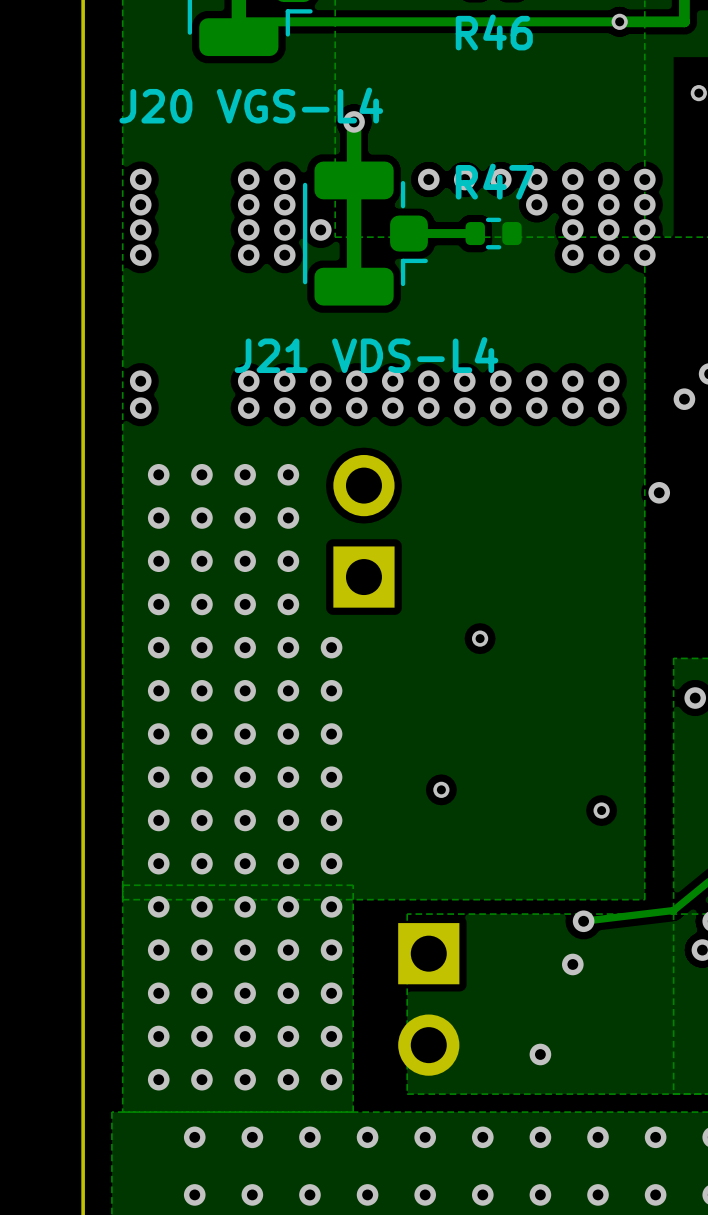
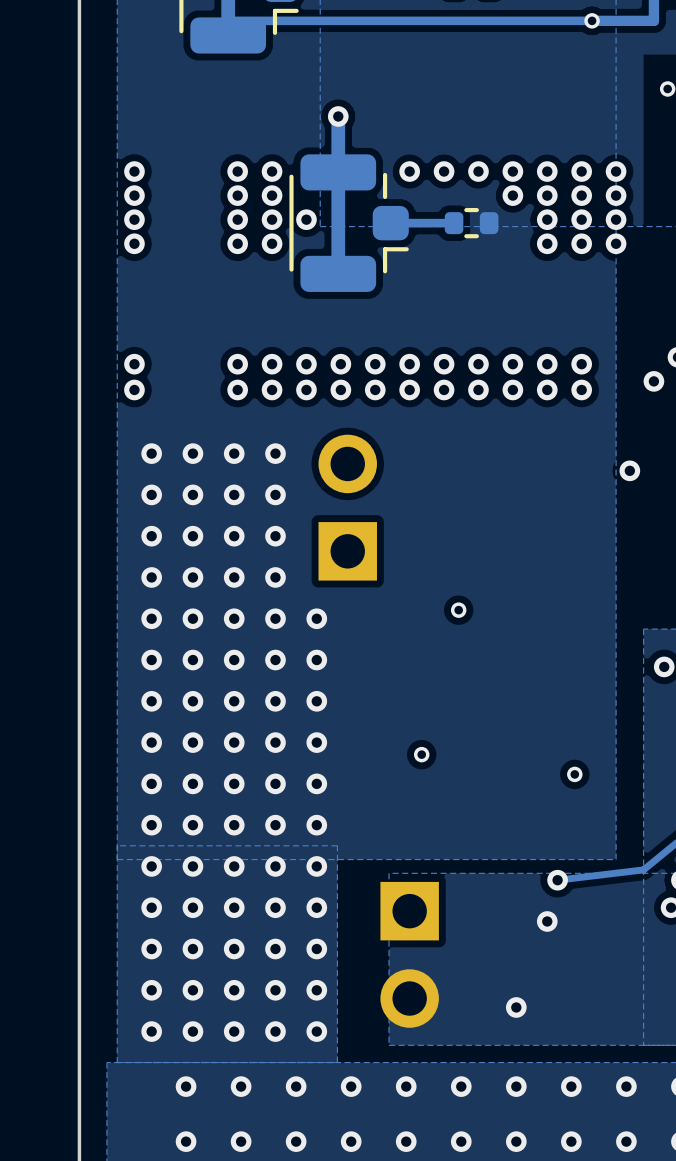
text: R46 (494, 32) -> none
text: J20 VGS-L4 (251, 105) -> none
text: R47 (494, 181) -> none
text: J21 VDS-L4 (366, 355) -> none

